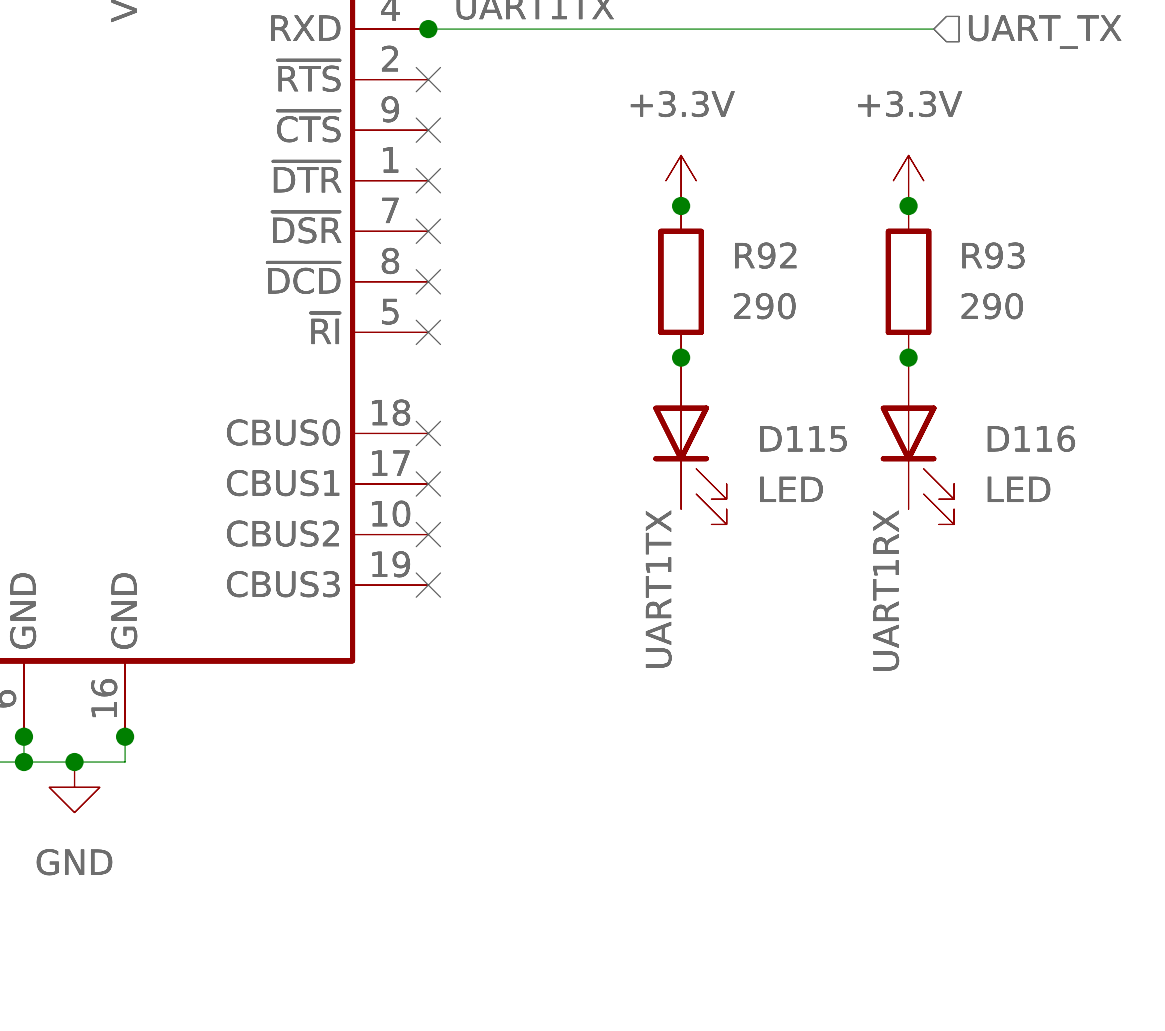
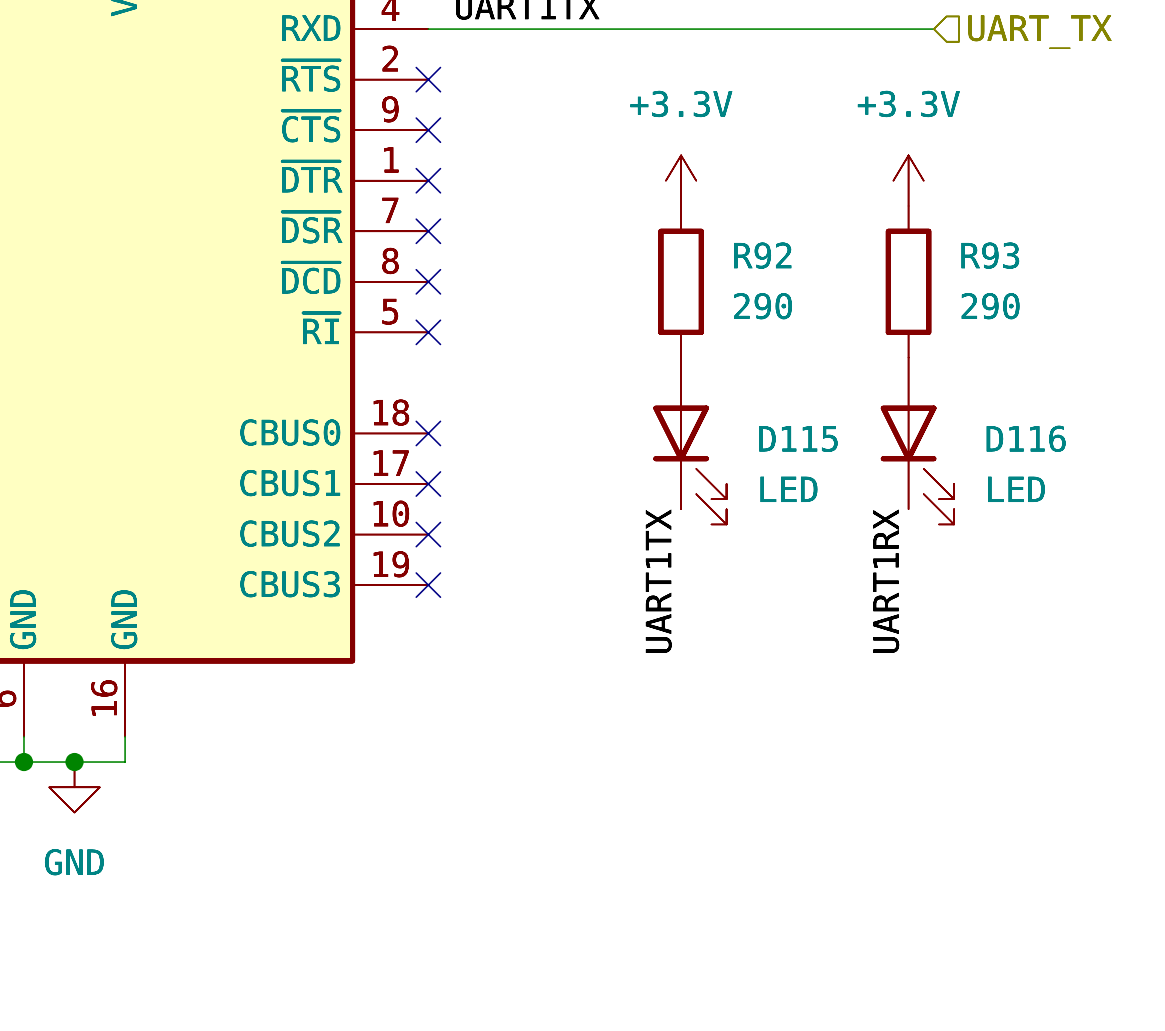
junction: (428, 29) -> none
junction: (681, 205) -> none
junction: (908, 205) -> none
junction: (681, 357) -> none
junction: (908, 357) -> none
junction: (23, 736) -> none
junction: (125, 736) -> none

